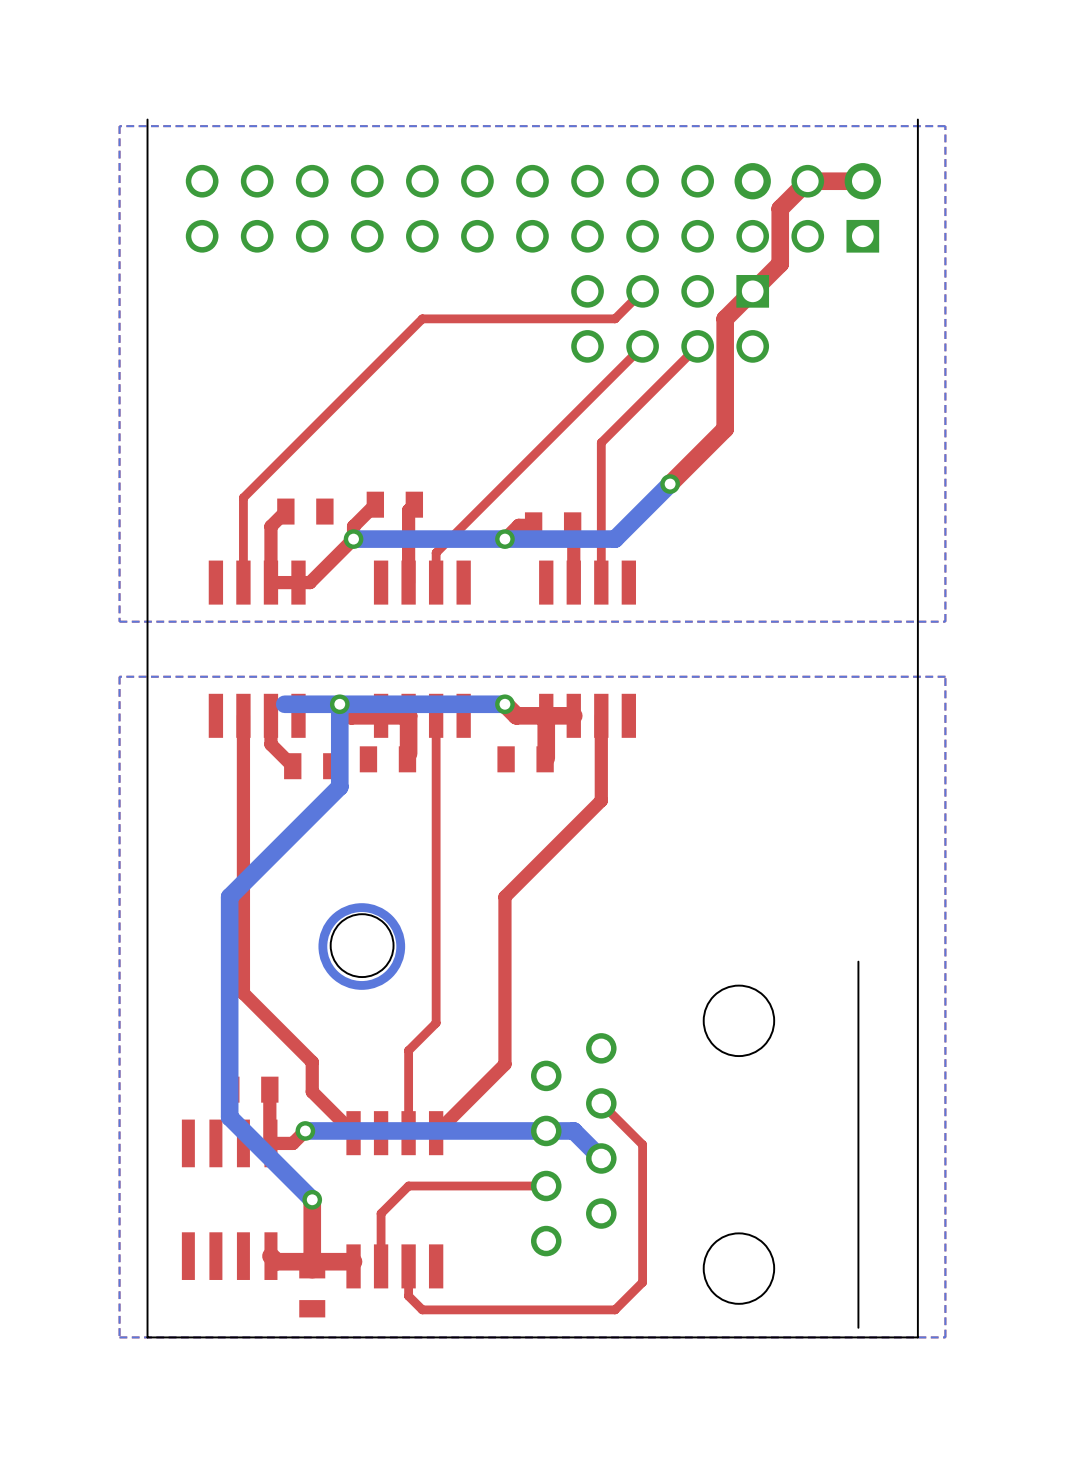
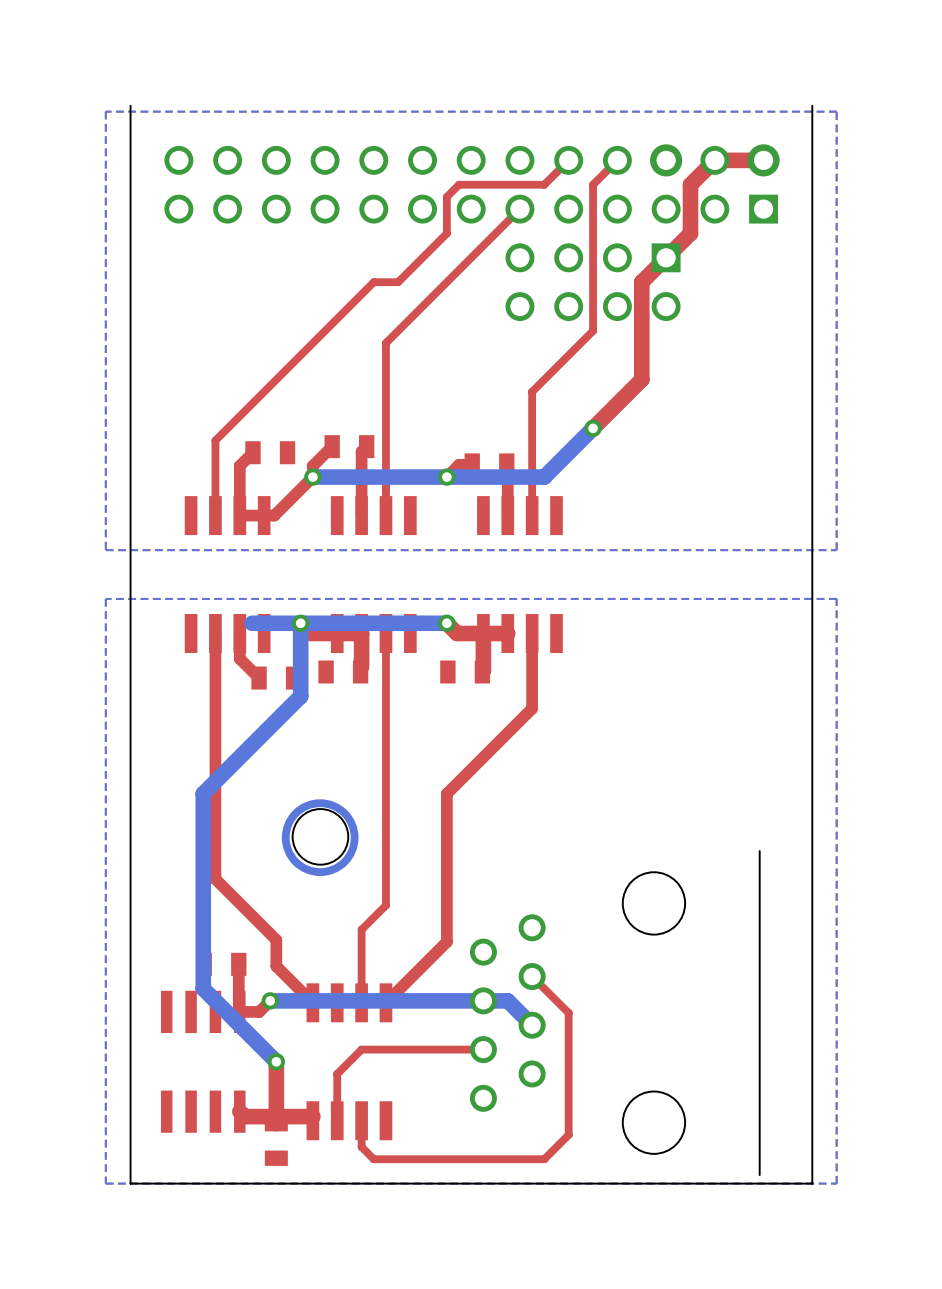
top track: (642, 291) (615, 318) (449, 318) -> (568, 160) (544, 184) (459, 184) (446, 196) (446, 233) (398, 282)
top track: (642, 346) (436, 552) -> (519, 209) (385, 343) (385, 489)
top track: (697, 346) (670, 373) -> (617, 160) (593, 184) (593, 330)

